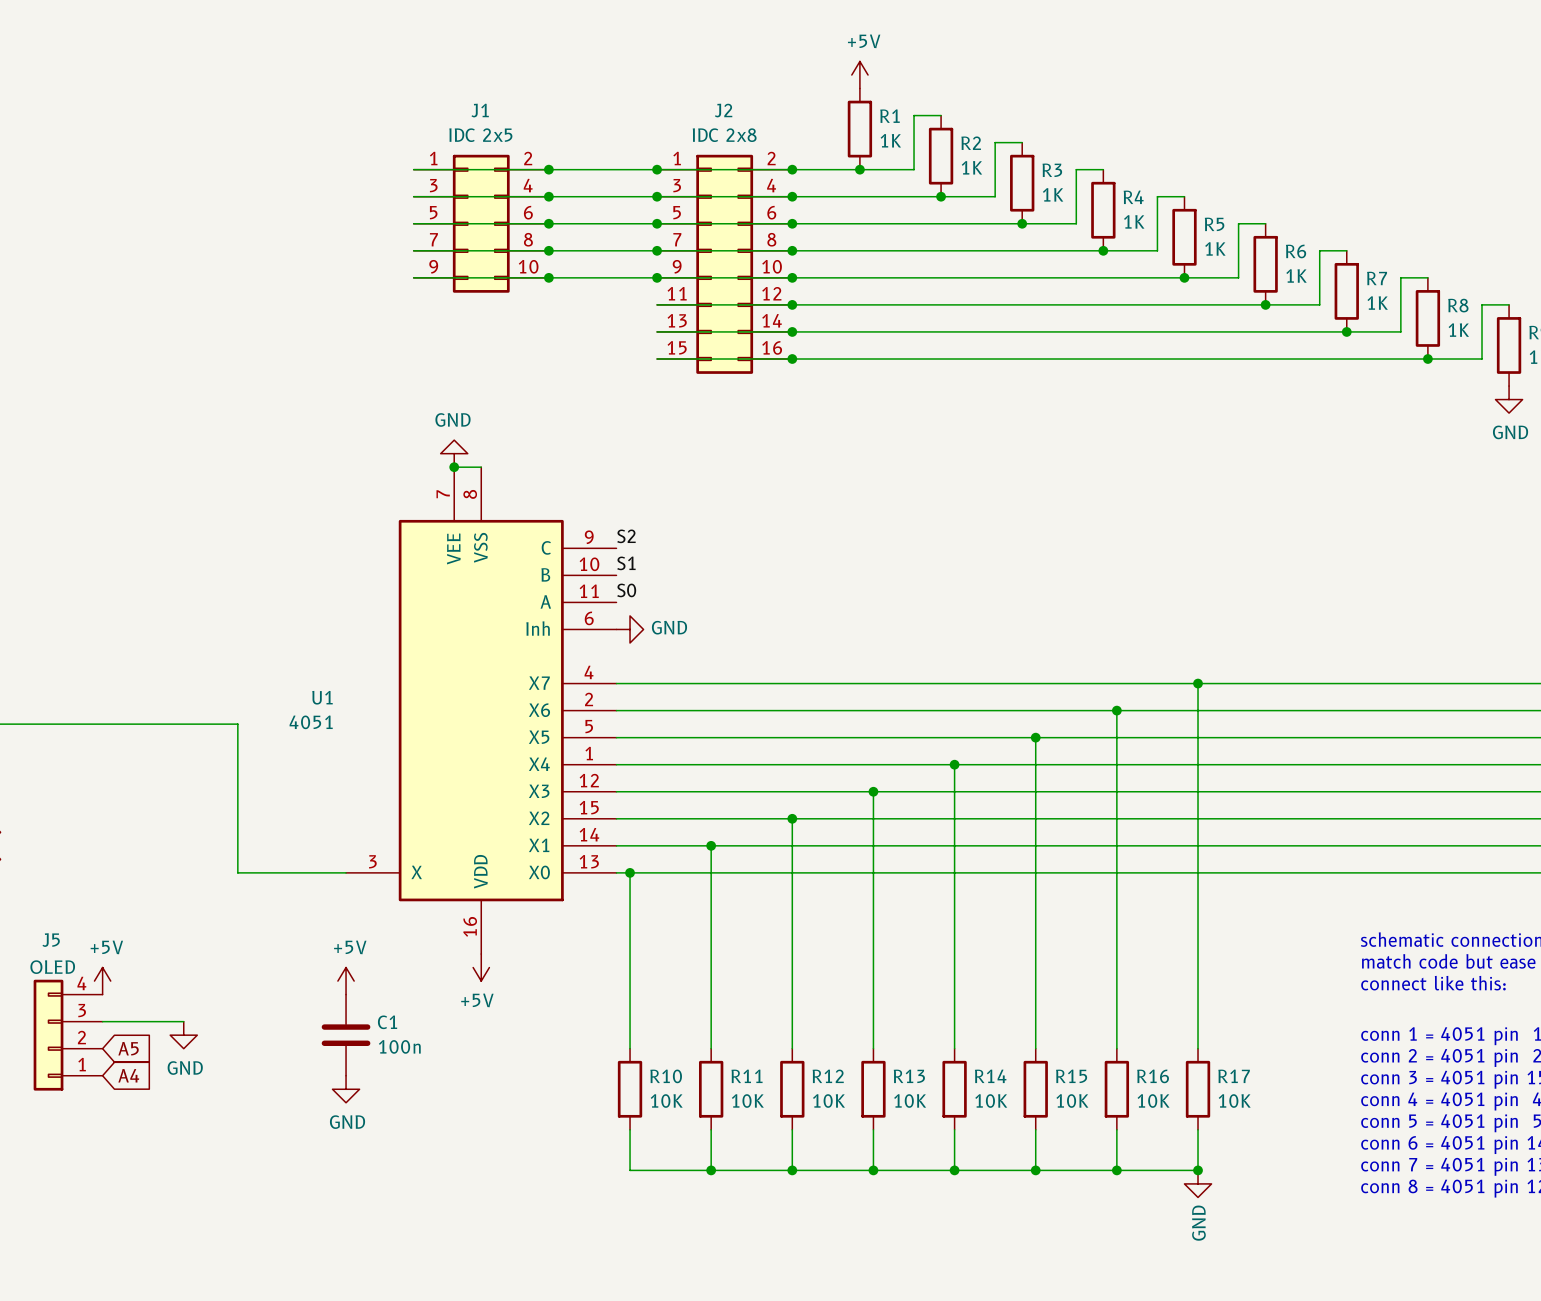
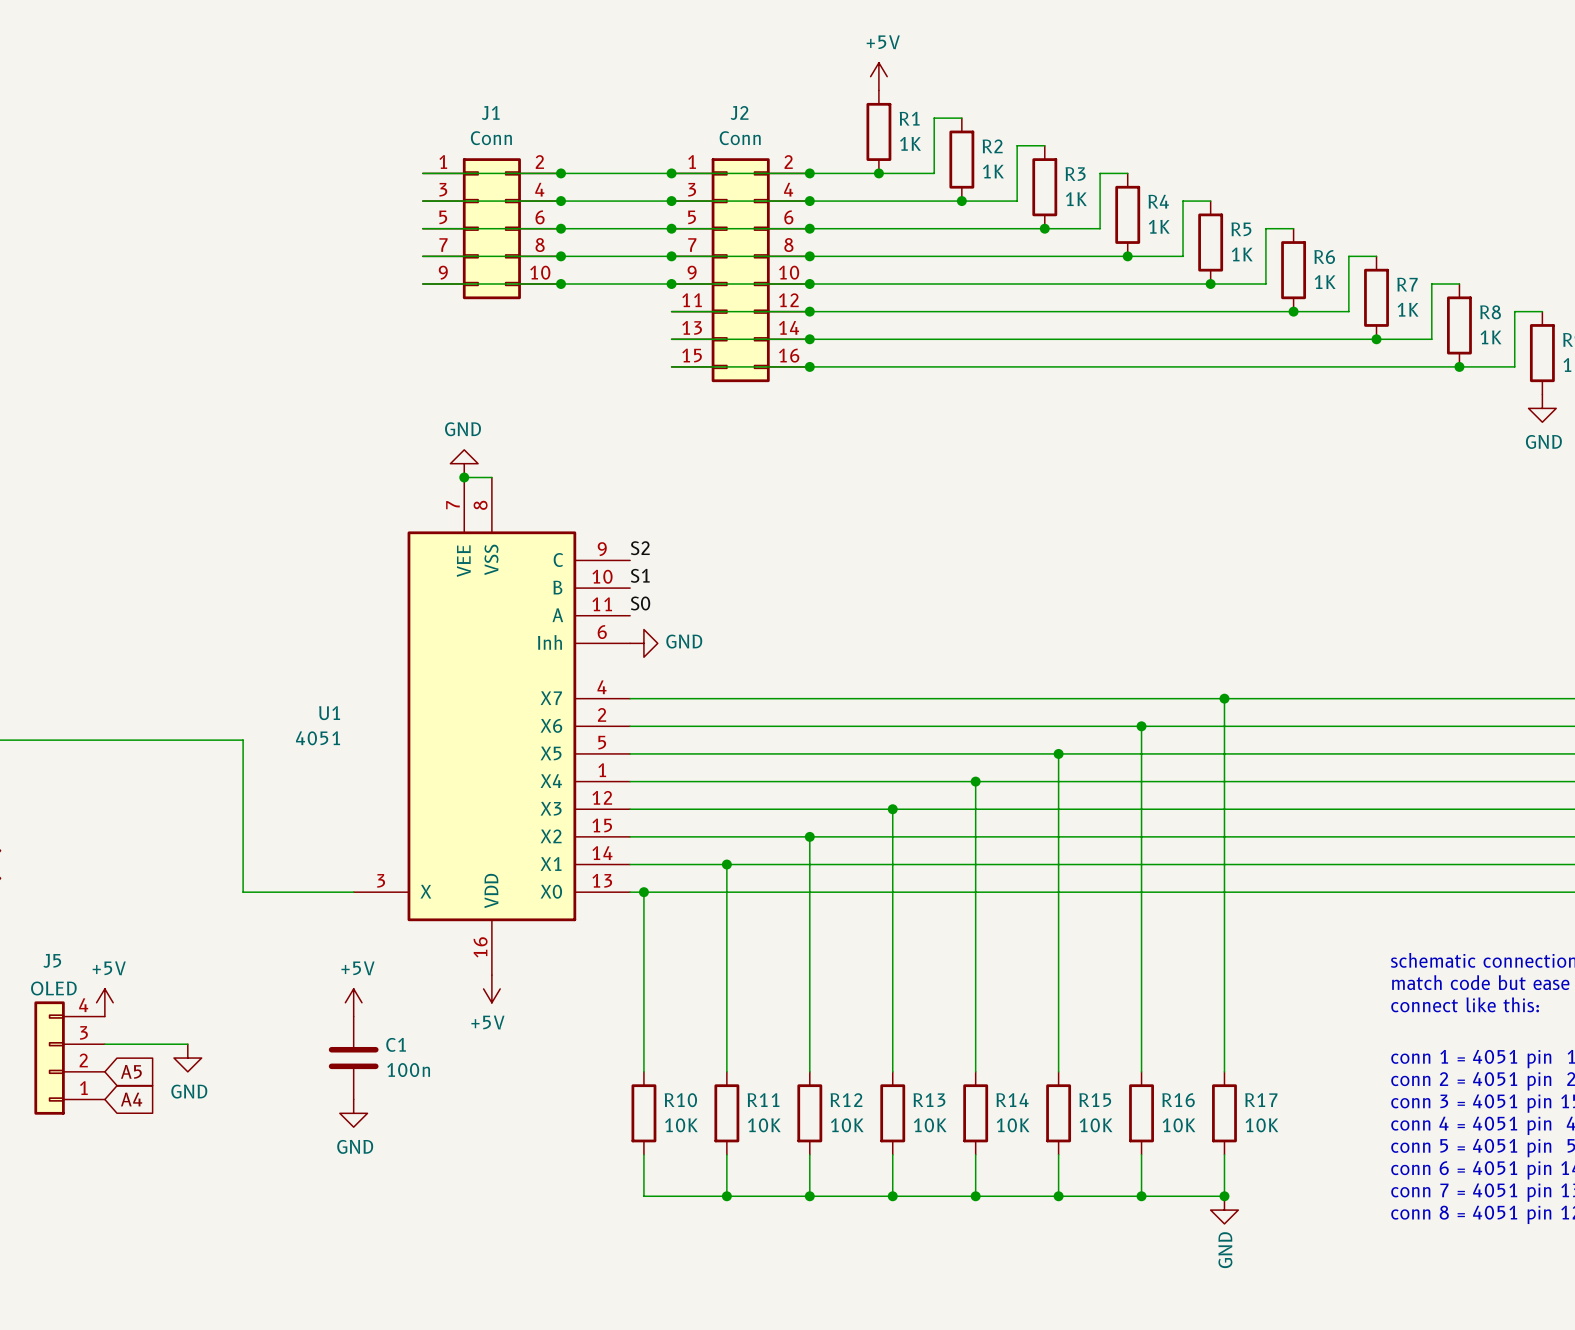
J1 value: IDC 2x5 (480, 135) -> Conn (491, 138)
J2 value: IDC 2x8 (724, 135) -> Conn (740, 138)

